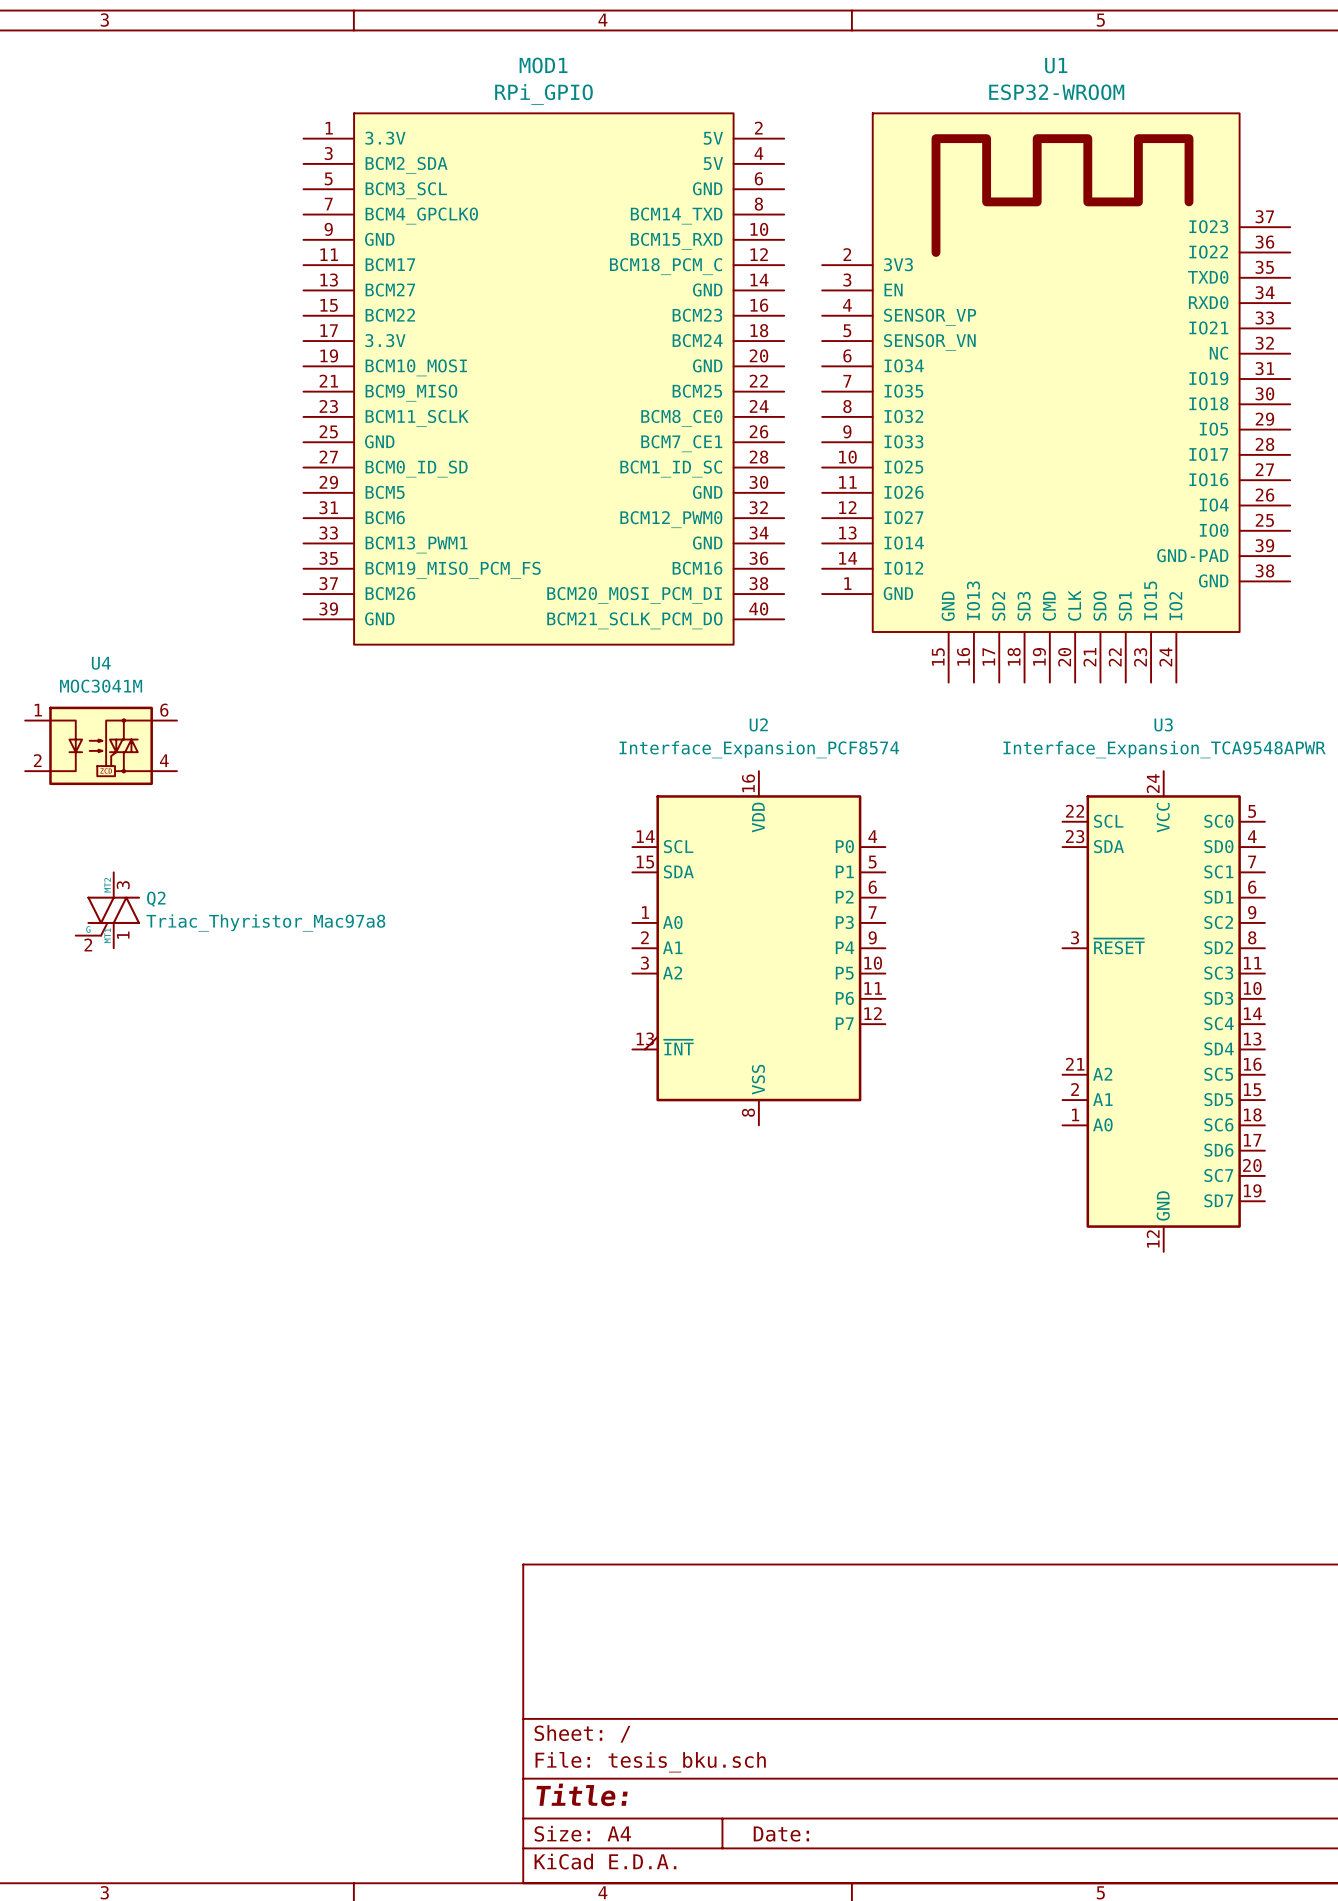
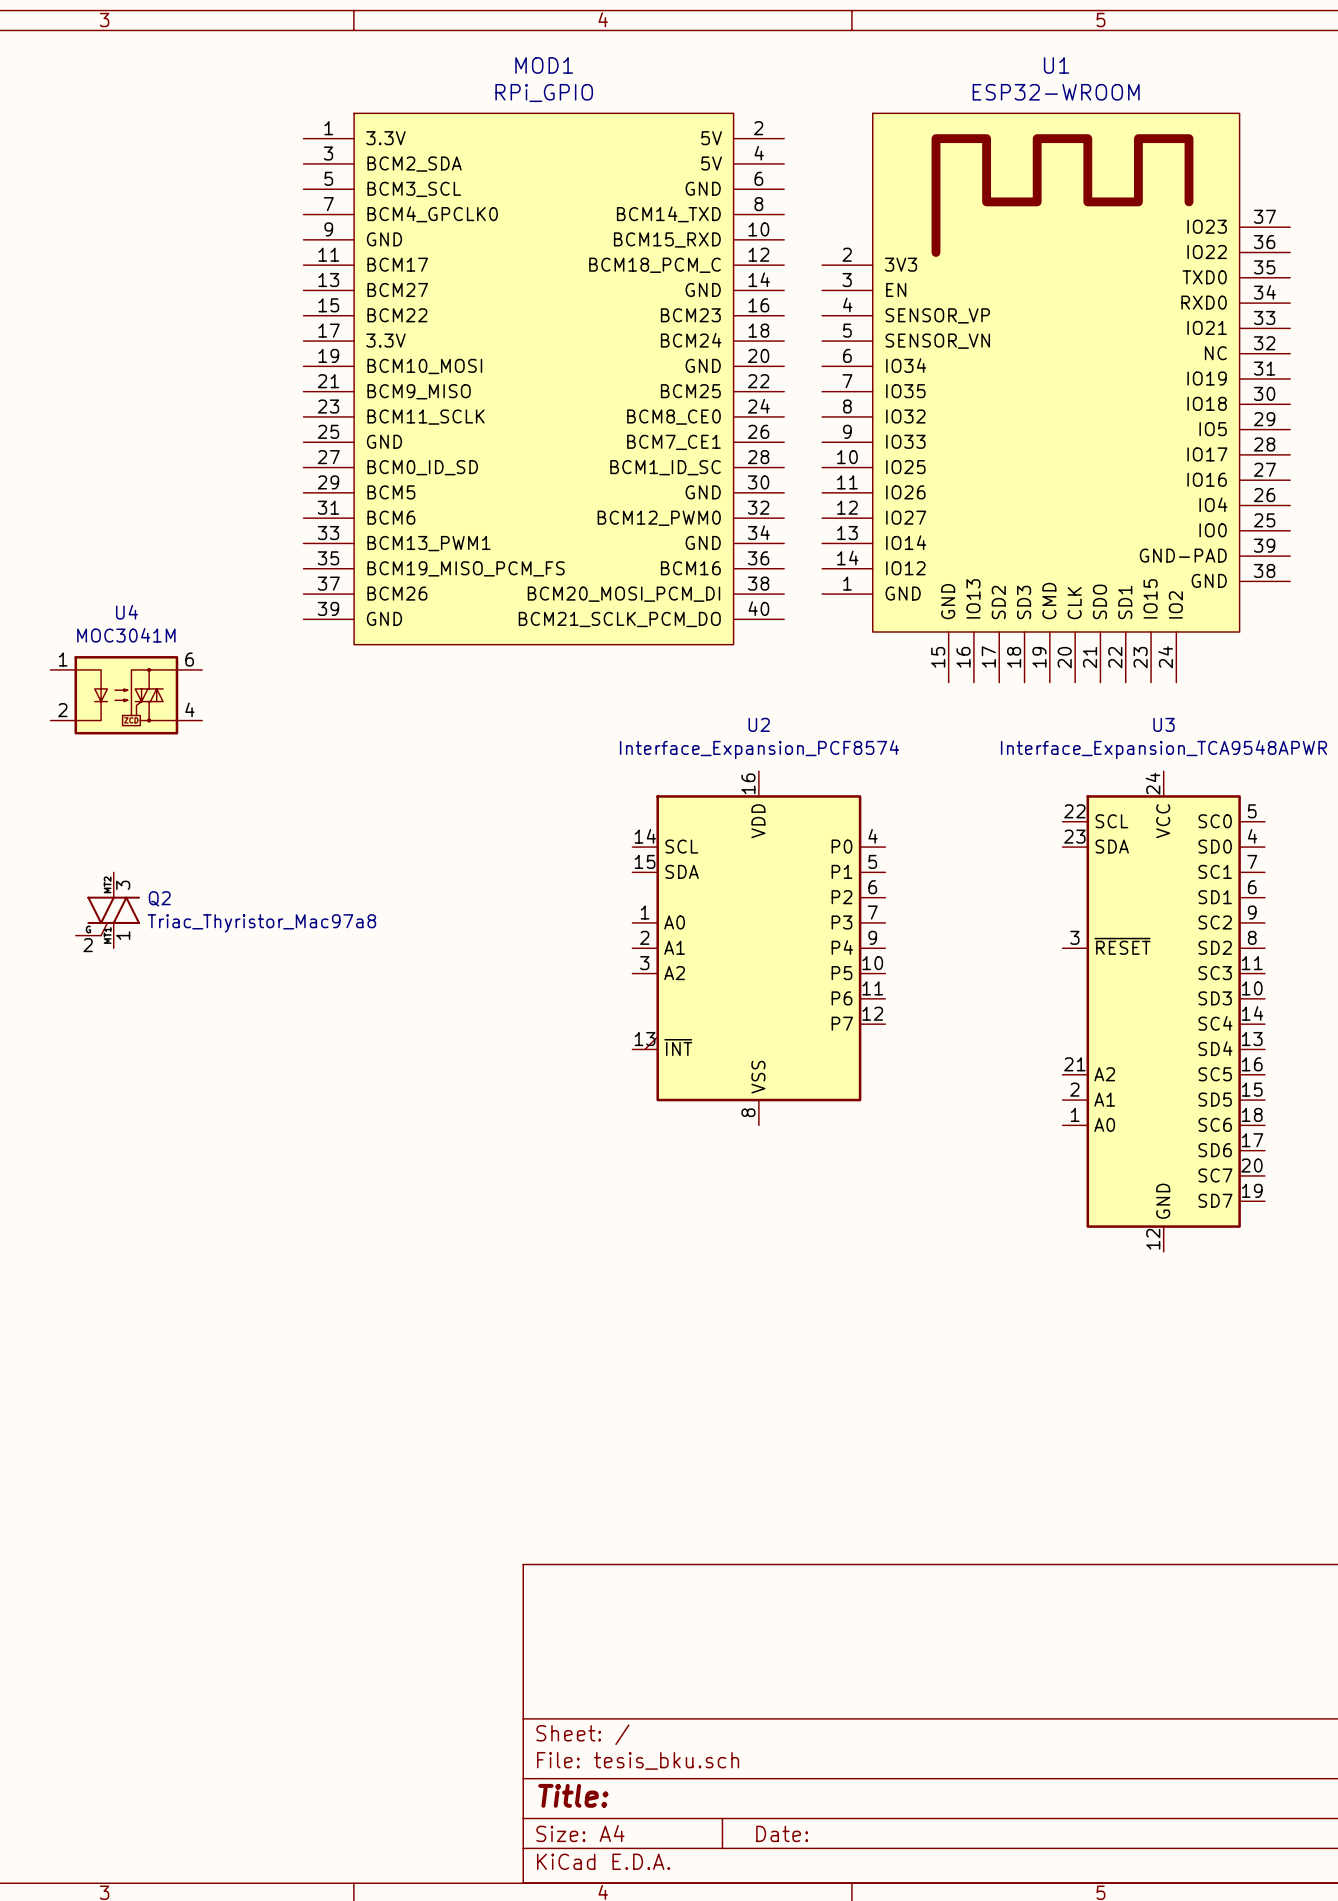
U4 position: (101, 745) -> (126, 695)

